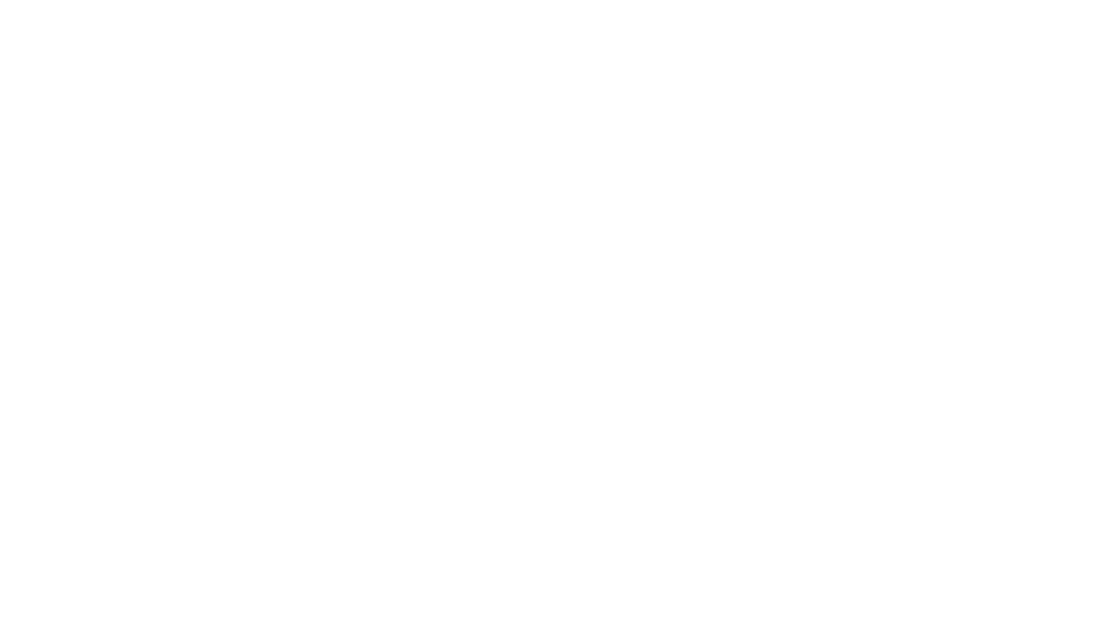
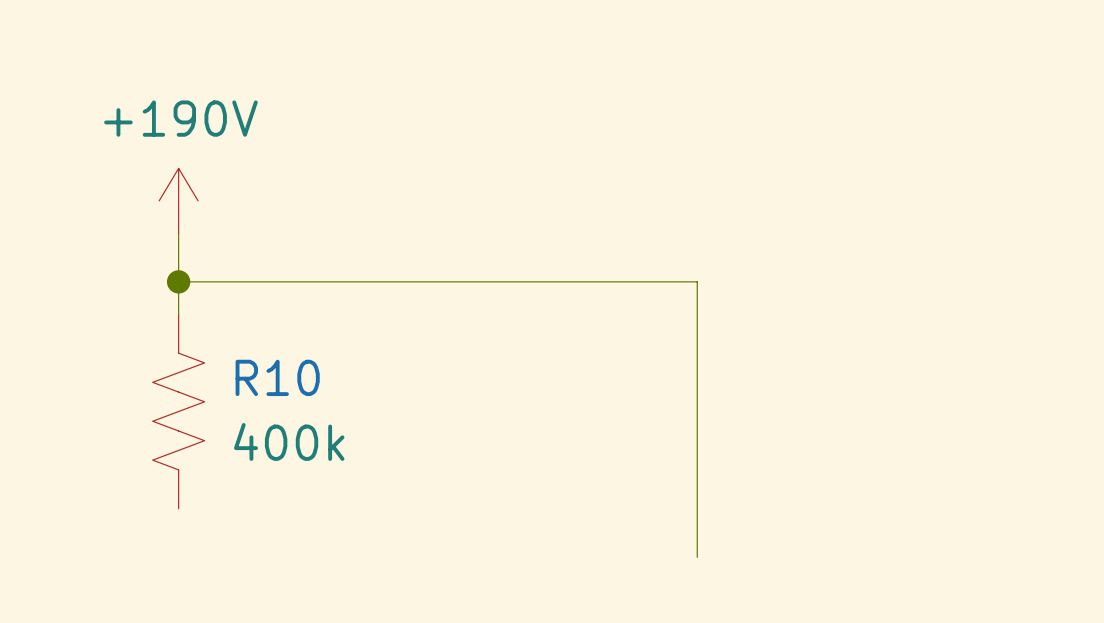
power symbol: none -> +190V (178, 200)
wire: none -> (178, 233) (178, 314)
wire: none -> (178, 281) (697, 281) (697, 557)
junction: none -> (178, 281)
R10: none -> 400k (178, 411)

